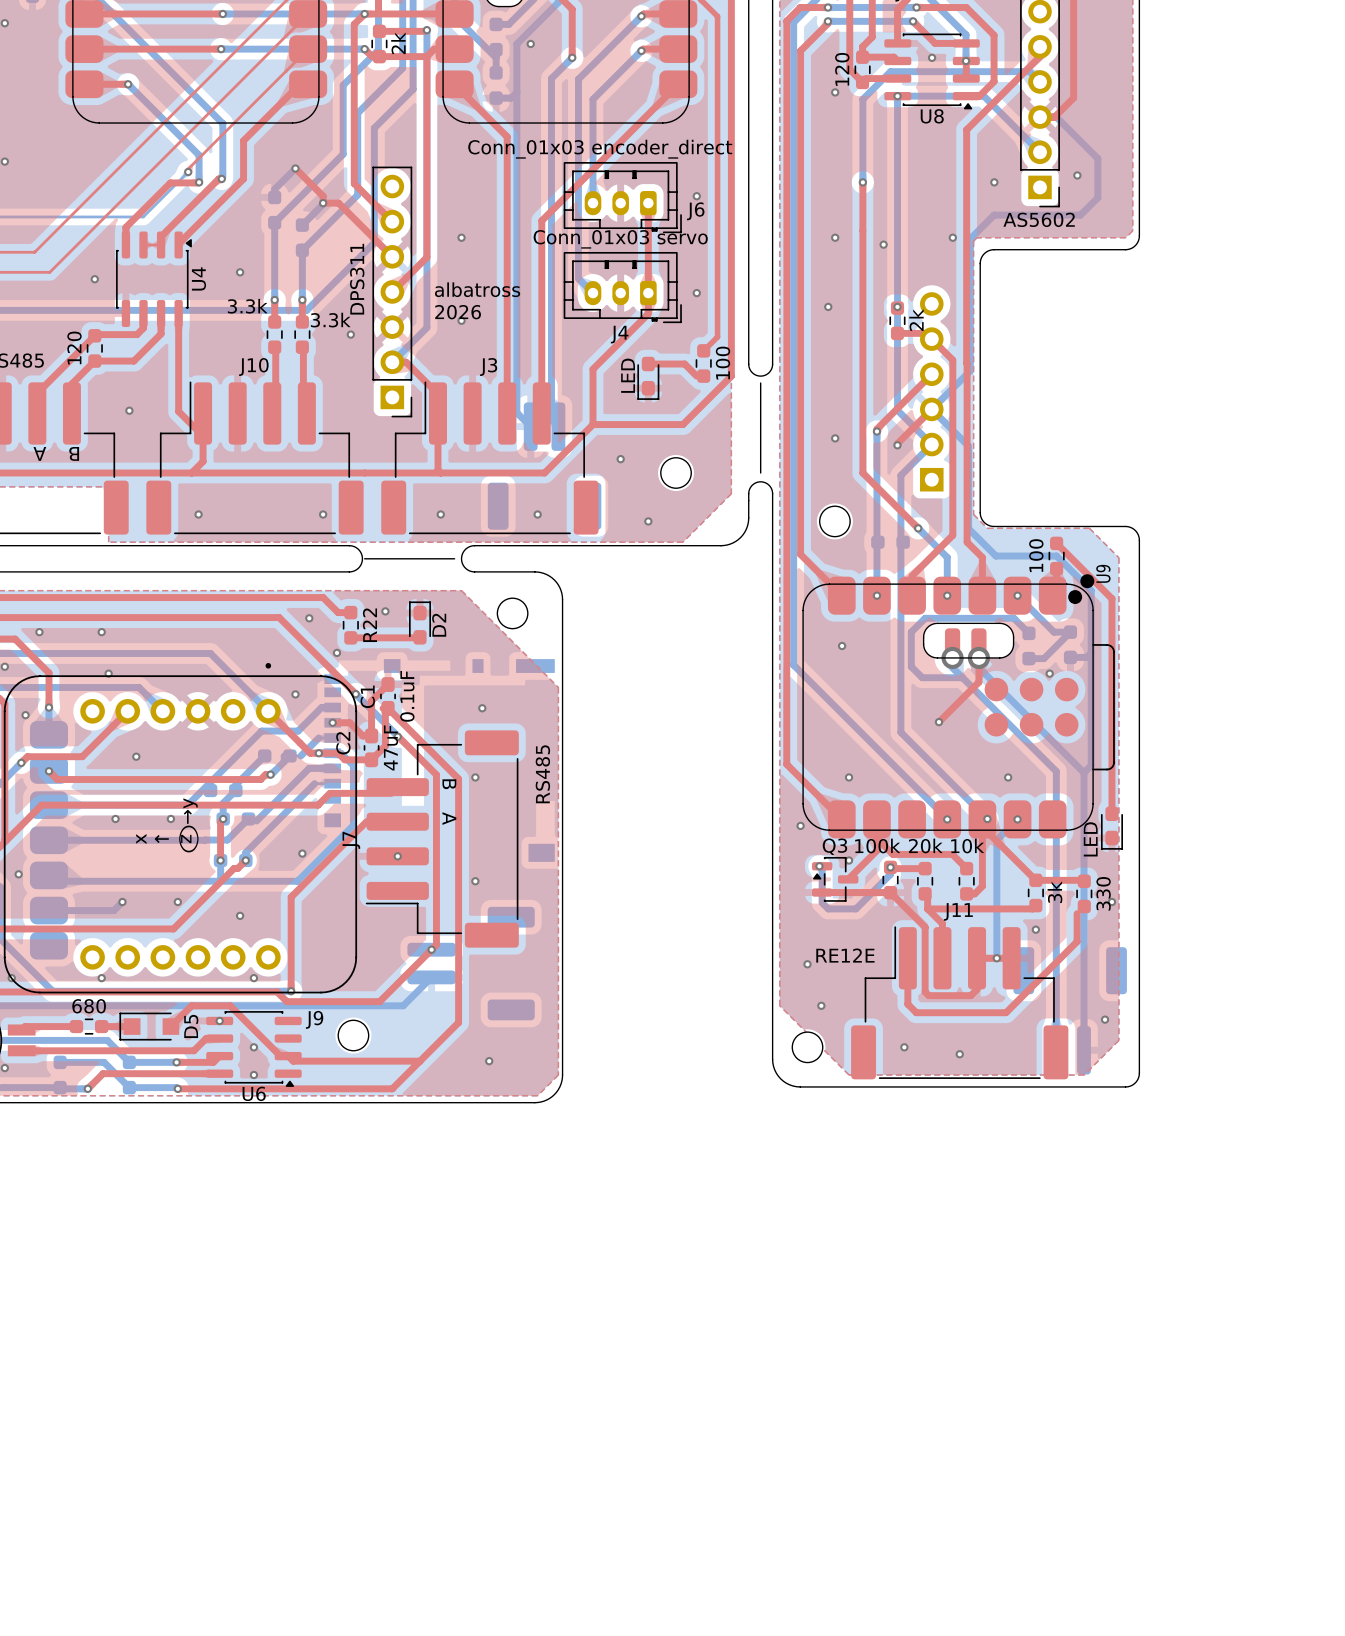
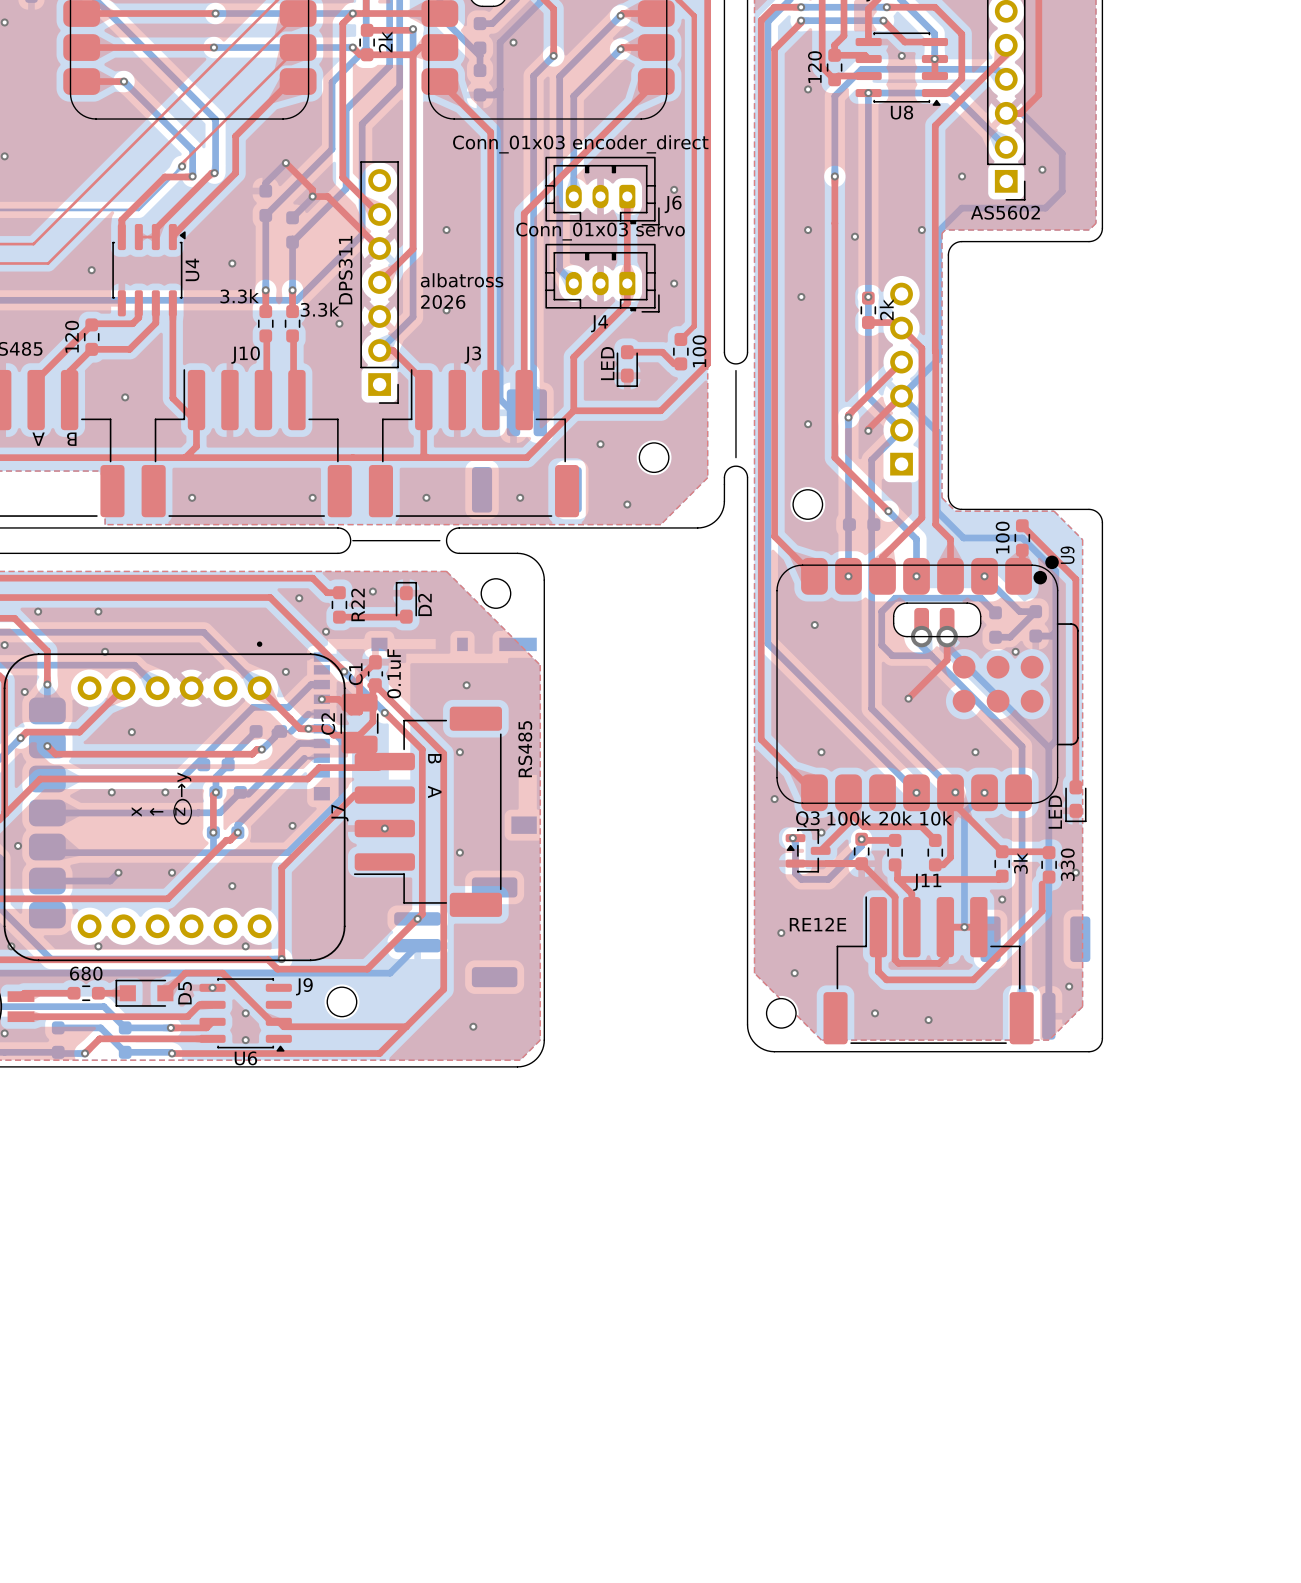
C2 footprint: [363, 728, 380, 768] -> [340, 693, 379, 754]
C2 value: 47uF (390, 747) -> none

